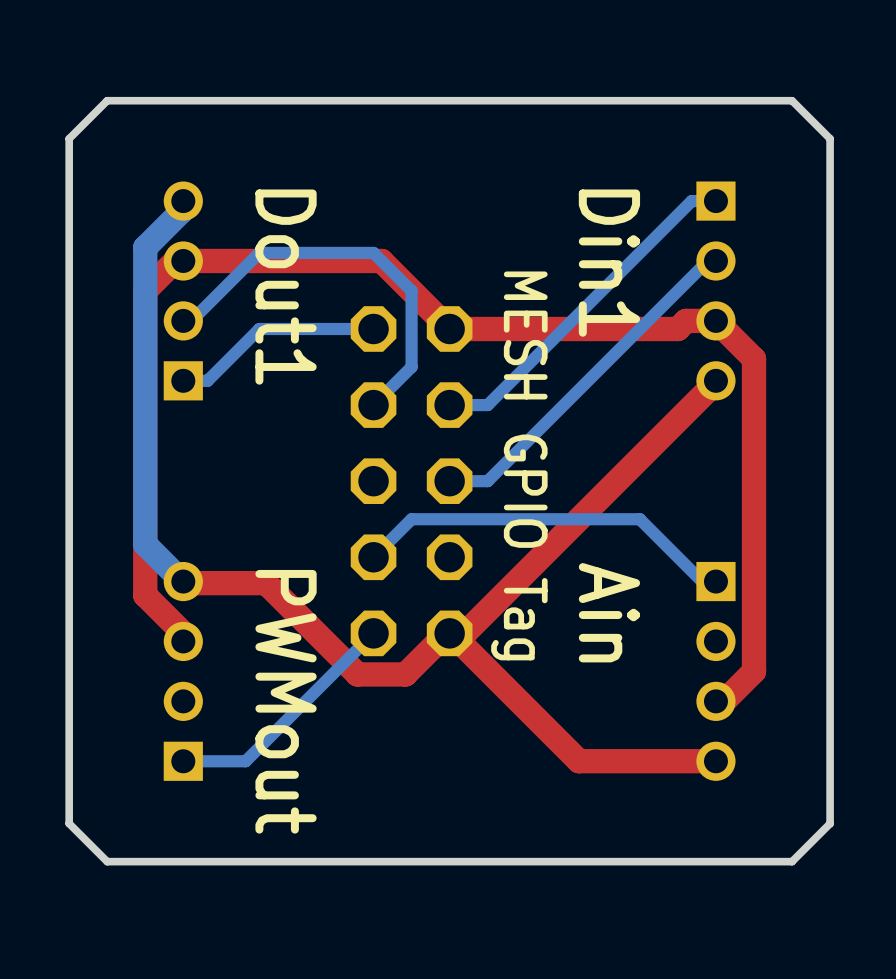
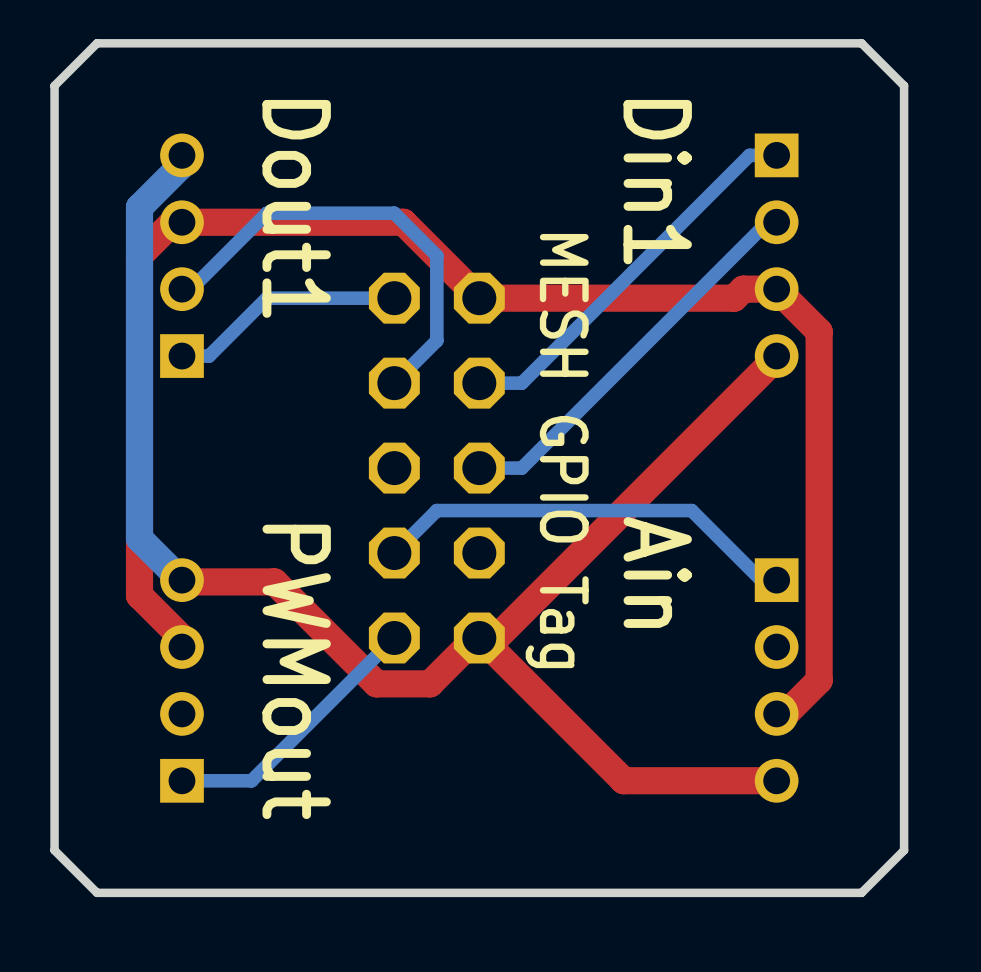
text position: Din1 (609, 263) -> Din1 (657, 182)
text position: Dout1 (286, 287) -> Dout1 (296, 208)
text position: Ain (609, 612) -> Ain (657, 572)
text position: PWMout (286, 701) -> PWMout (296, 671)

